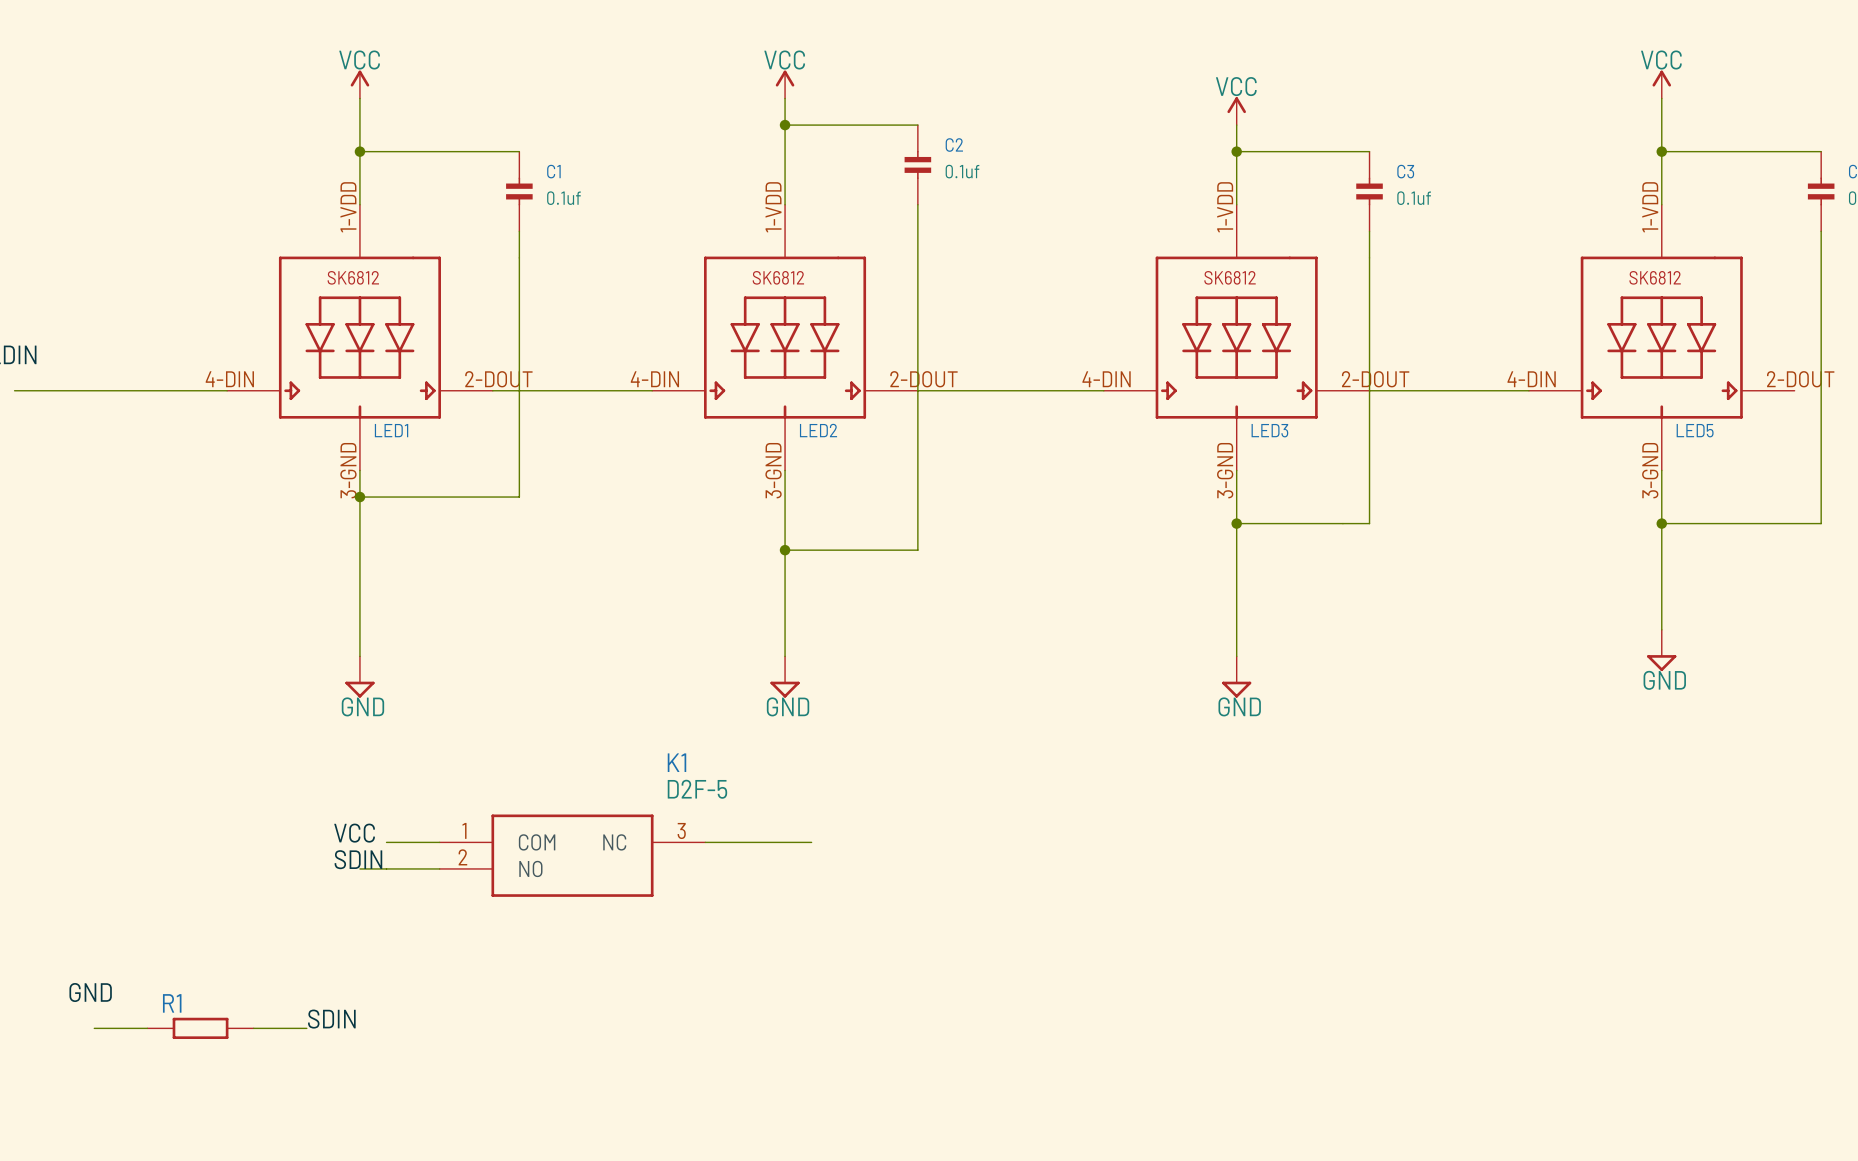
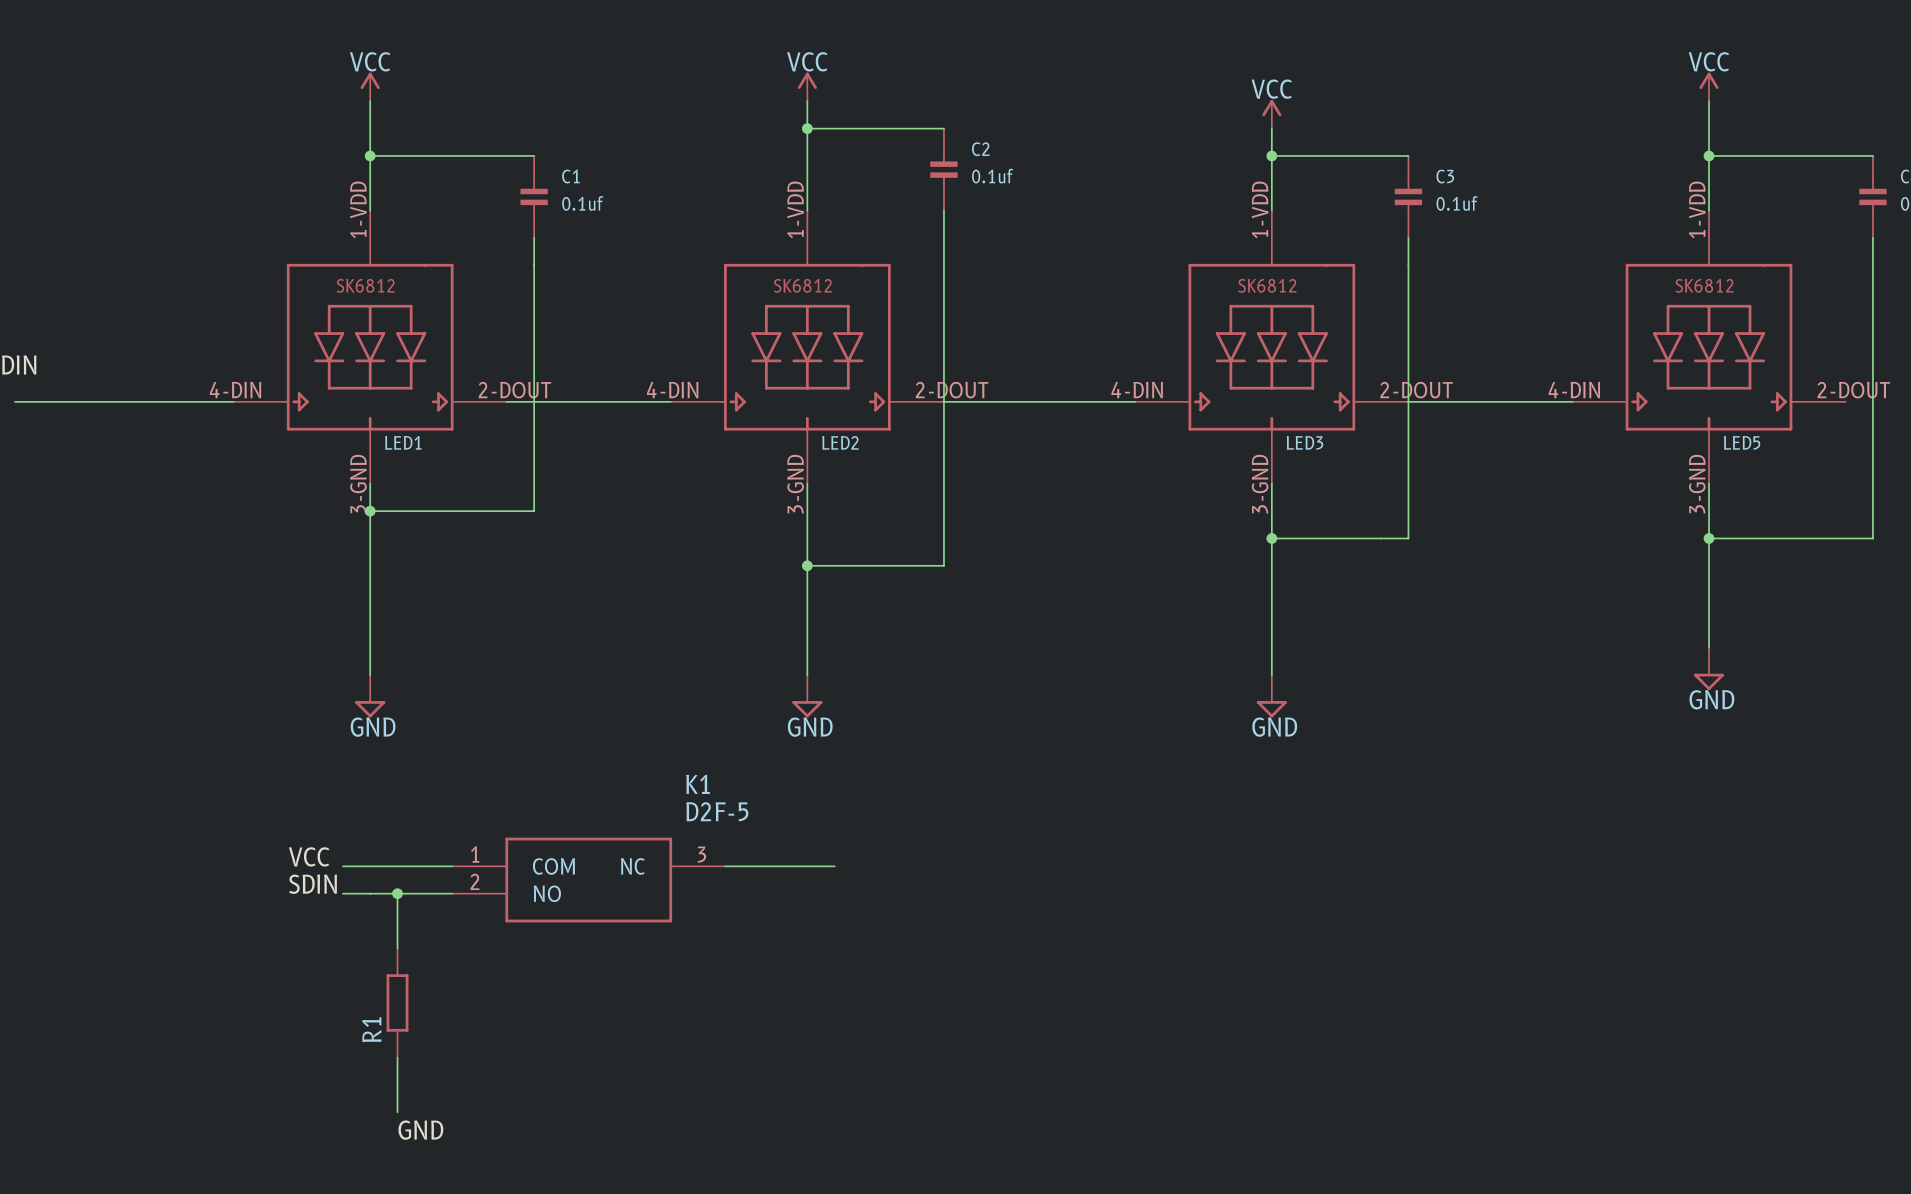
label position: VCC (354, 833) -> VCC (309, 856)
label position: SDIN (358, 859) -> SDIN (313, 884)
wire: none -> (342, 893) (370, 893)
wire: none -> (397, 893) (397, 948)
junction: none -> (397, 893)
label: GND (90, 992) -> none
R1 name position: R1 (172, 1003) -> R1 (371, 1029)
label: SDIN (331, 1019) -> none
wire: (94, 1028) (147, 1028) -> none
R1 rotation: 0° (200, 1028) -> 90° clockwise (397, 1002)
R1 position: (200, 1028) -> (397, 1002)
wire: (253, 1028) (306, 1028) -> (342, 866) (397, 866)
wire: none -> (397, 1057) (397, 1112)
label: none -> GND (420, 1130)

